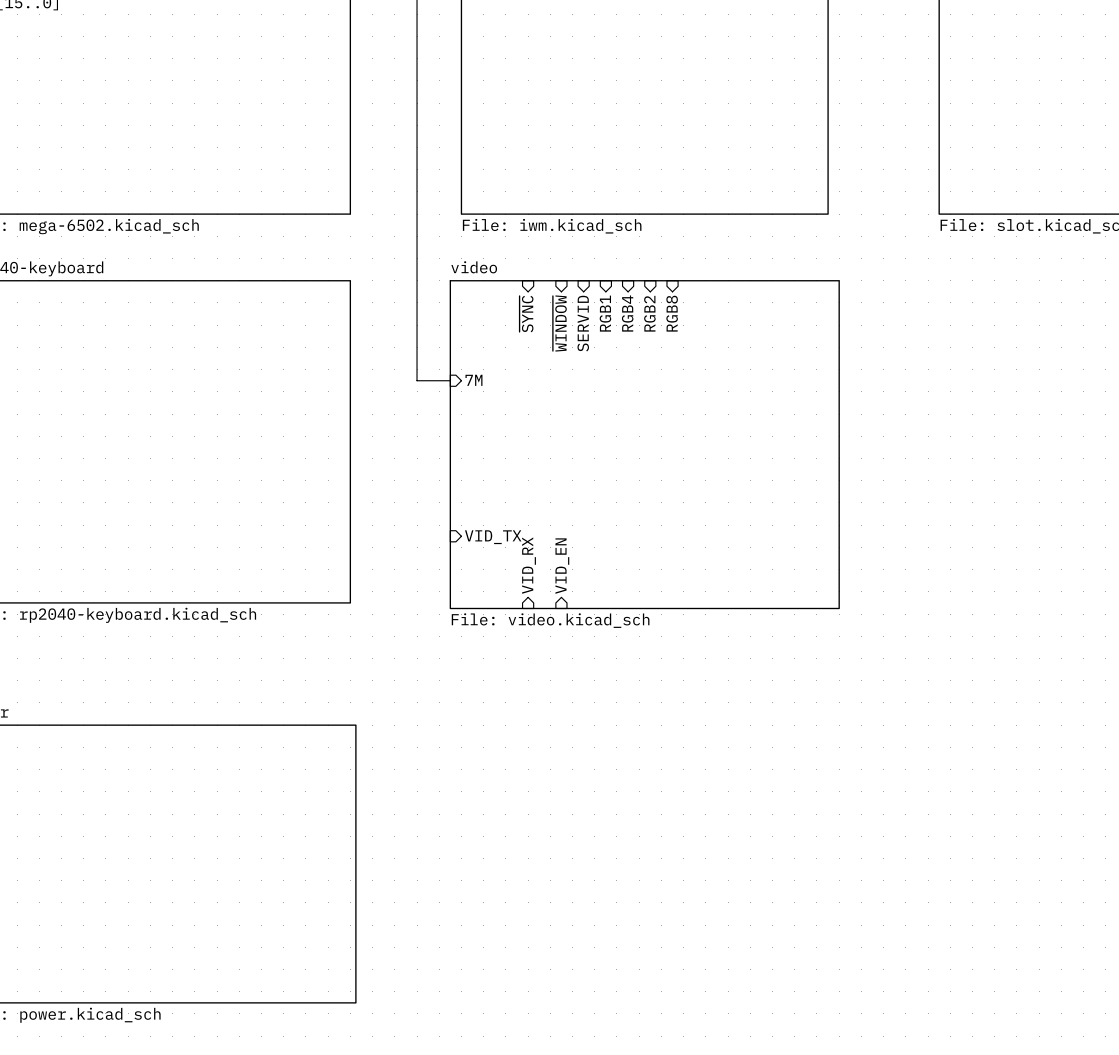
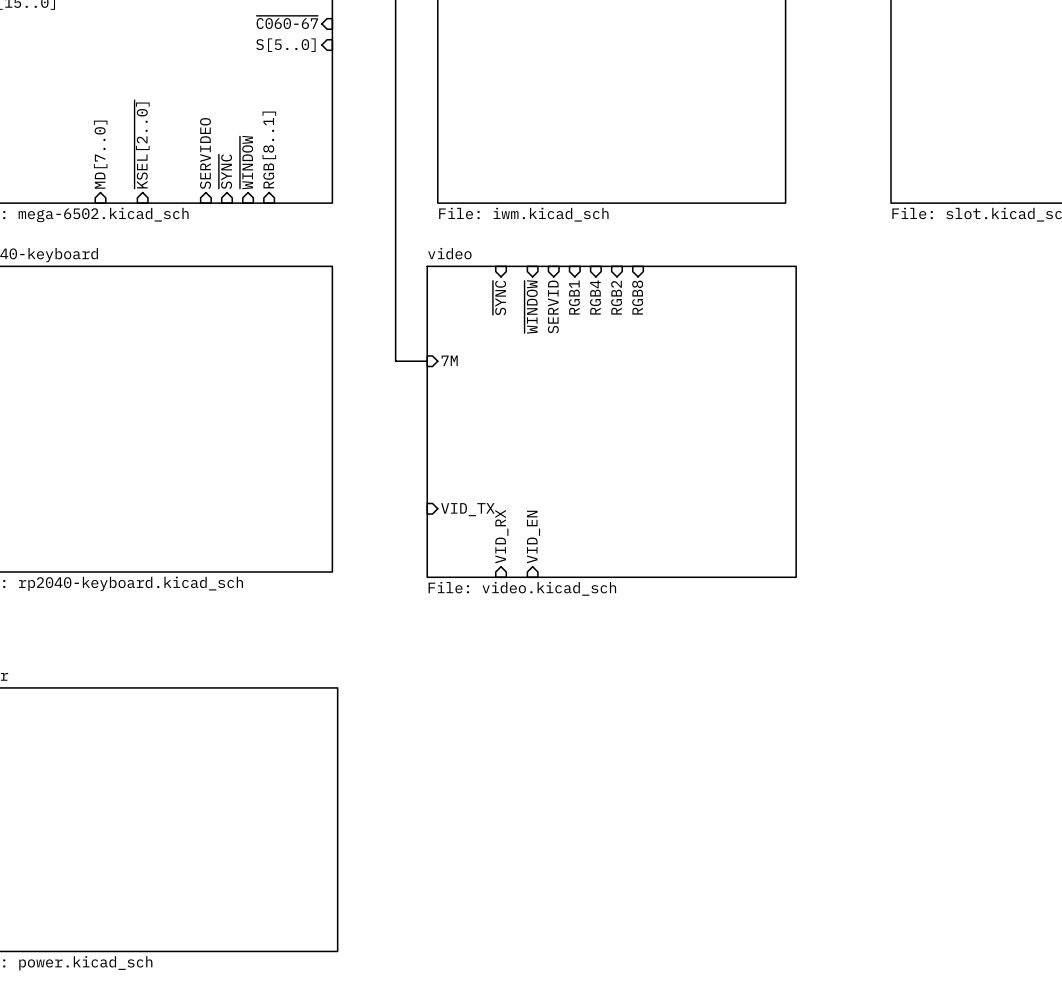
sheet pin: none -> ~{C060-67} (287, 22)
sheet pin: none -> S[5..0] (285, 45)
sheet pin: none -> ~{KSEL[2..0]} (142, 144)
sheet pin: none -> RGB[8..1] (269, 149)
sheet pin: none -> SERVIDEO (205, 153)
sheet pin: none -> MD[7..0] (100, 154)
sheet pin: none -> ~{WINDOW} (246, 162)
sheet pin: none -> ~{SYNC} (225, 171)

